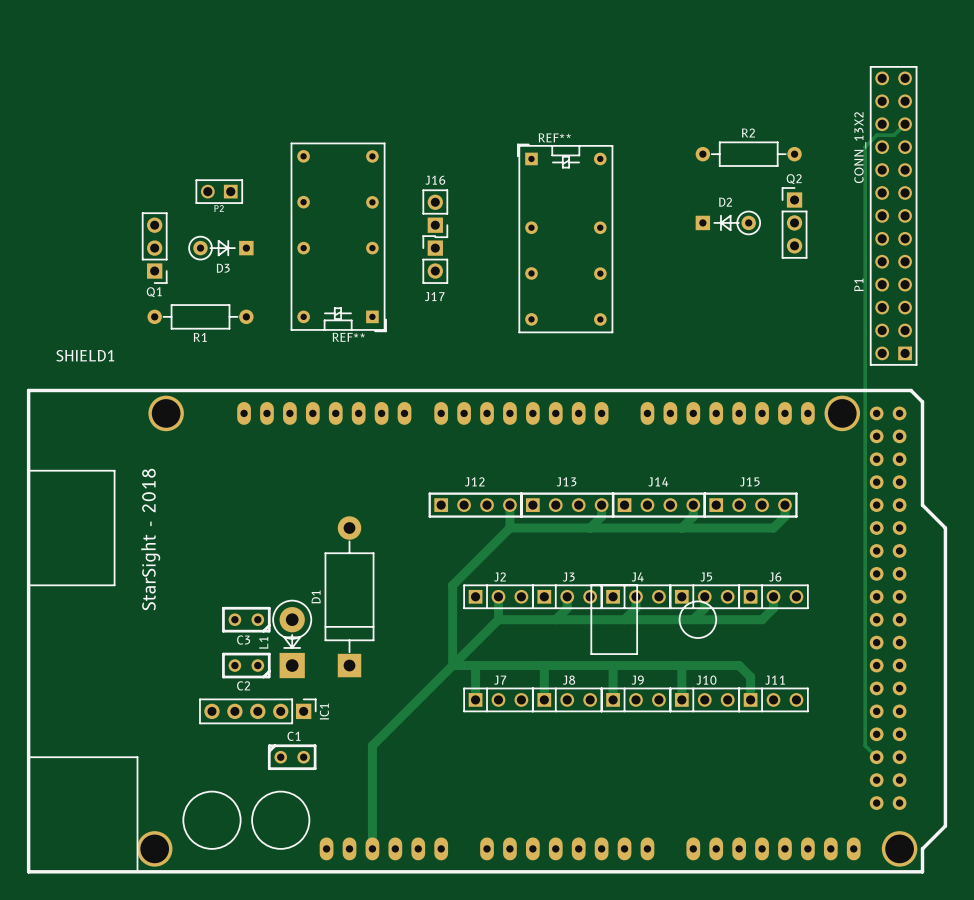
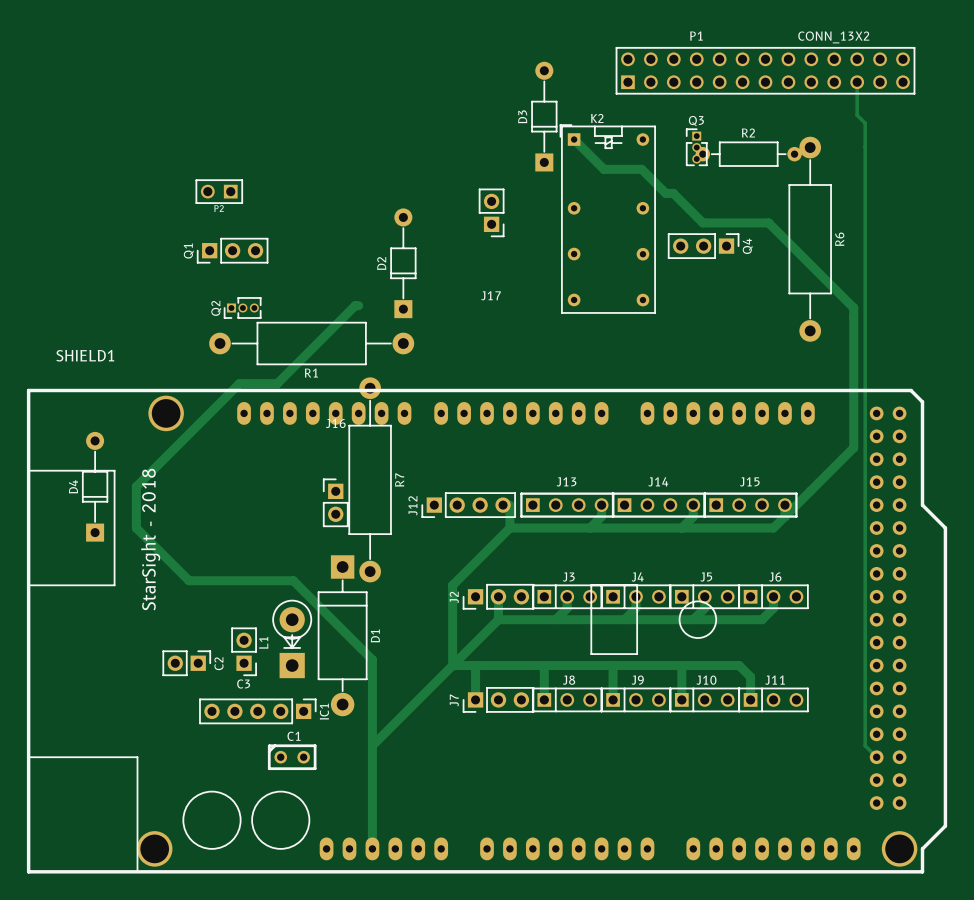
track: (905, 124) (894, 135) (876, 135) (865, 146) -> (857, 82) (857, 115) (865, 123) (865, 146)
track: none -> (574, 139) (603, 169) (641, 169) (665, 193) (673, 193) (702, 222) (768, 222) (853, 307) (853, 447) (784, 516)
Q3: none -> (696, 147)
Q2 name position: Q2 (794, 179) -> Q2 (216, 308)
Q2 footprint: [782, 187, 808, 259] -> [224, 297, 262, 319]
D2 name position: D2 (725, 202) -> D2 (381, 263)
D2 footprint: [695, 210, 761, 235] -> [390, 208, 417, 319]
J17 position: (435, 213) -> (491, 212)
P1 rotation: 0° (893, 215) -> 90° clockwise (765, 70)
P1 position: (893, 215) -> (765, 70)
K2: none -> (607, 219)
D3 footprint: [188, 236, 254, 261] -> [531, 61, 558, 172]
REF**: (338, 237) -> none
REF**: (565, 238) -> none
R6: none -> (810, 239)
Q4: none -> (703, 246)
Q1 rotation: 0° (154, 248) -> 90° clockwise (232, 250)
Q1 position: (154, 248) -> (232, 250)
J16 position: (435, 259) -> (335, 502)
D3 name position: D3 (223, 268) -> D3 (522, 116)
R1 footprint: [147, 304, 254, 330] -> [209, 322, 415, 365]
track: none -> (358, 305) (355, 305) (277, 383) (239, 383) (136, 486) (136, 528) (189, 580) (293, 580) (372, 659) (372, 745)
SHIELD1 footprint: [26, 388, 948, 874] -> [26, 388, 948, 874]
R7: none -> (370, 479)
J12 name position: J12 (474, 481) -> J12 (412, 505)
D4: none -> (95, 486)
J12 footprint: [428, 492, 523, 518] -> [421, 492, 516, 518]
J2 name position: J2 (500, 577) -> J2 (454, 597)
J2 footprint: [463, 584, 534, 609] -> [463, 584, 534, 610]
D1 rotation: 0° (349, 596) -> 180° (342, 635)
C3 footprint: [222, 606, 271, 633] -> [231, 627, 257, 676]
C2 footprint: [222, 652, 271, 679] -> [162, 650, 211, 676]
J7 name position: J7 (500, 680) -> J7 (454, 700)
C2 name position: C2 (243, 685) -> C2 (218, 663)
J7 footprint: [463, 687, 534, 713] -> [463, 687, 534, 713]

